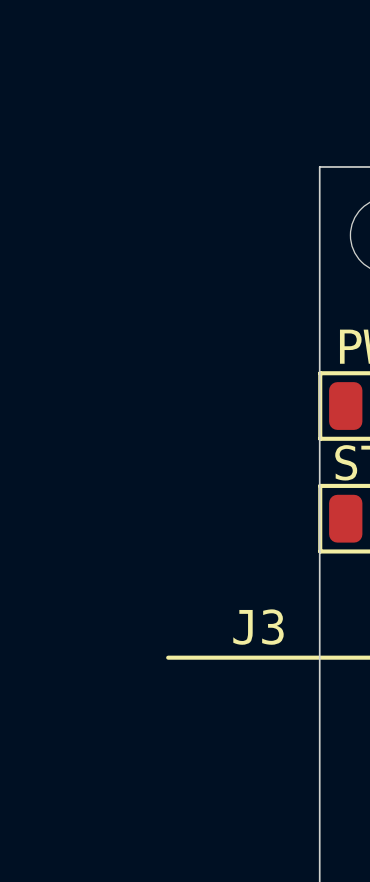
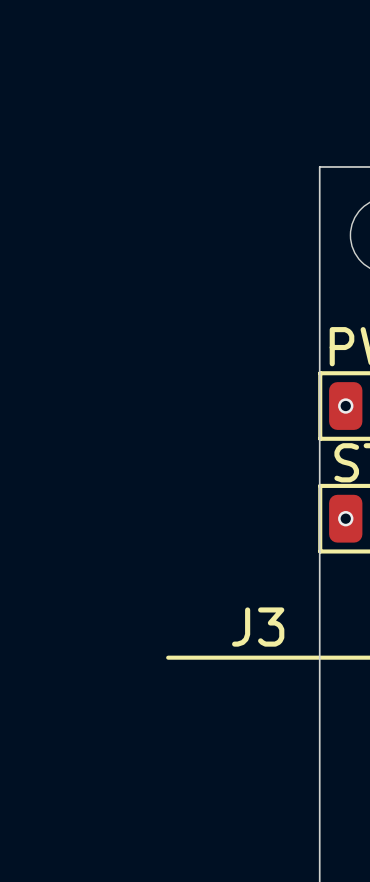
via: none -> (345, 406)
via: none -> (345, 518)

